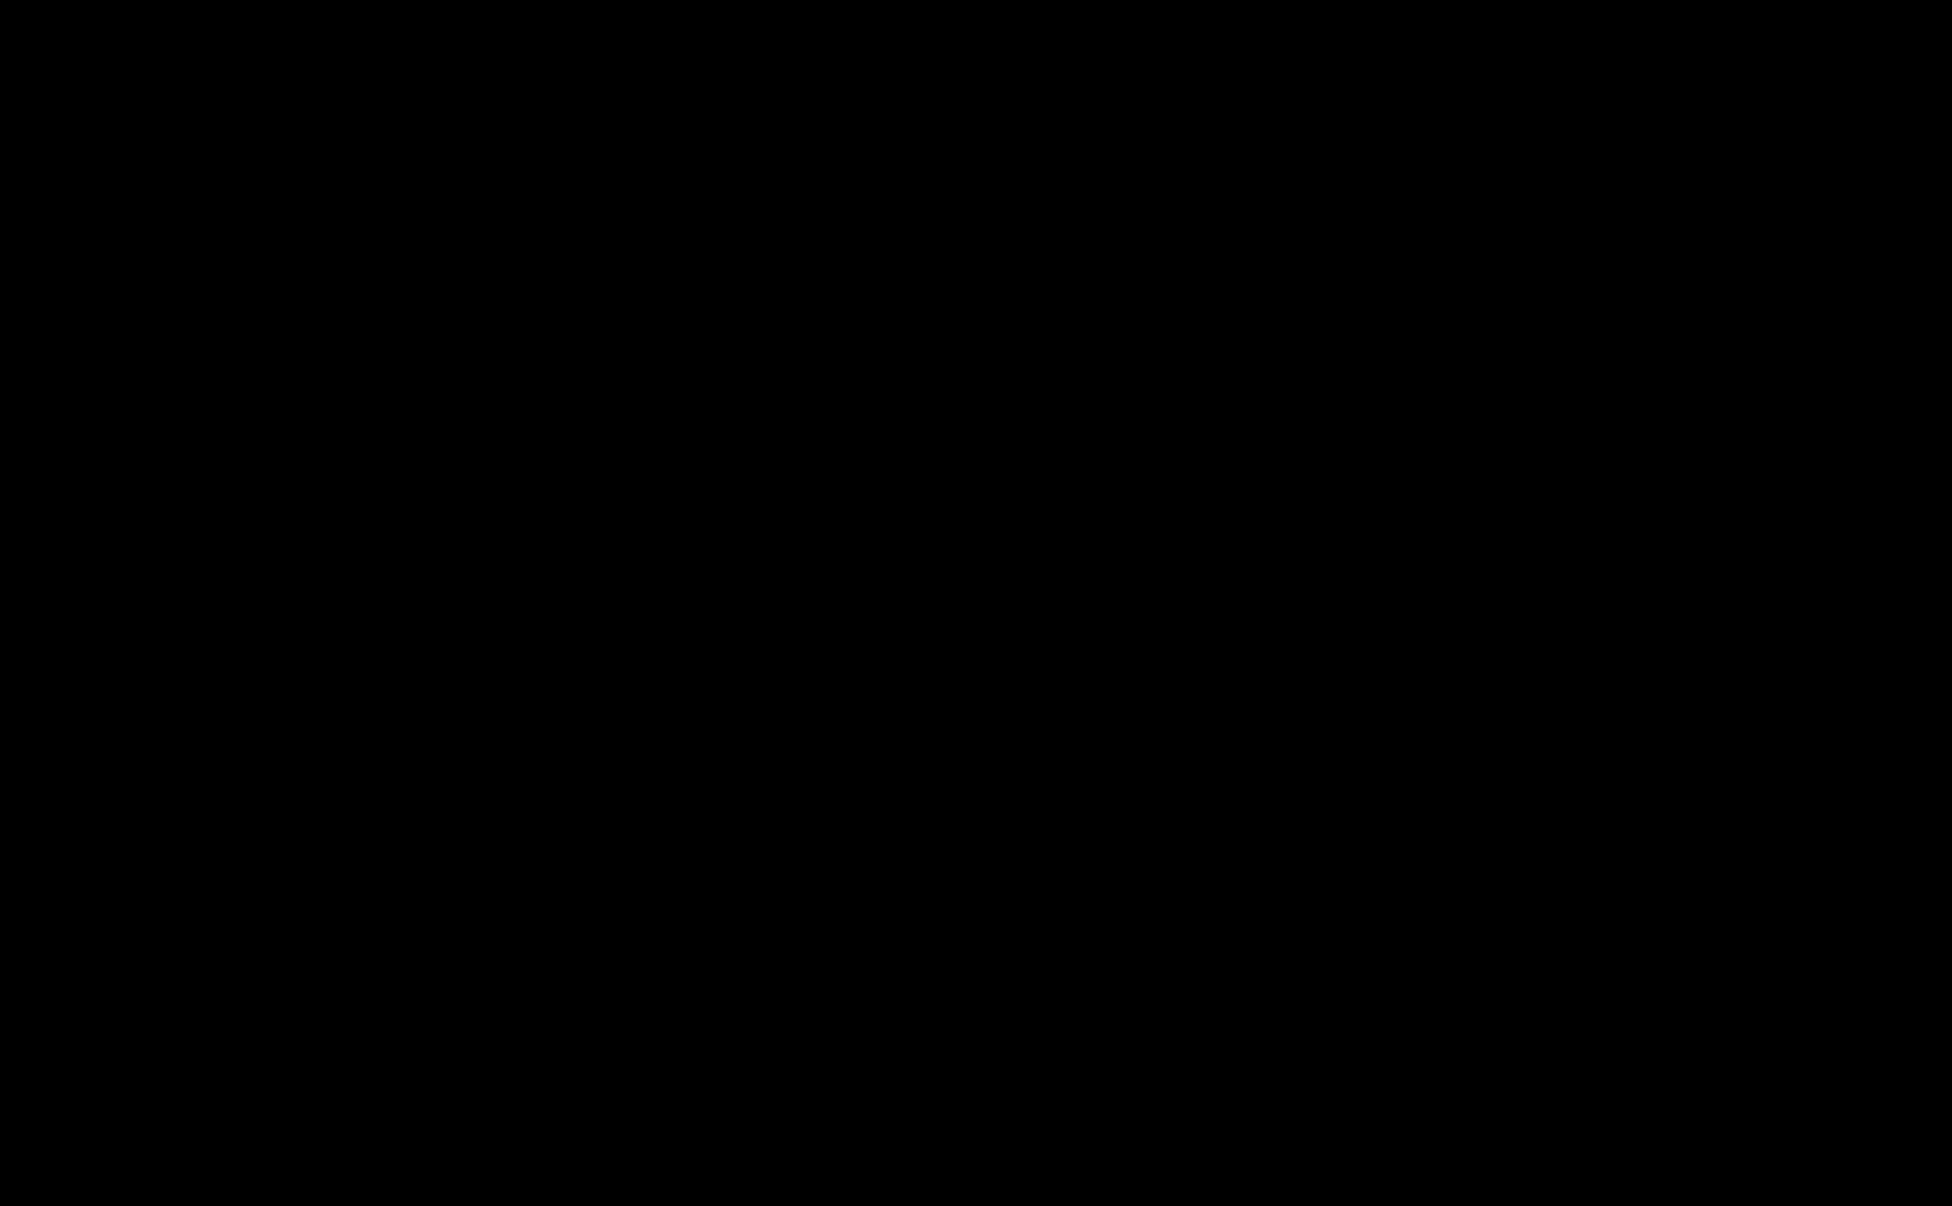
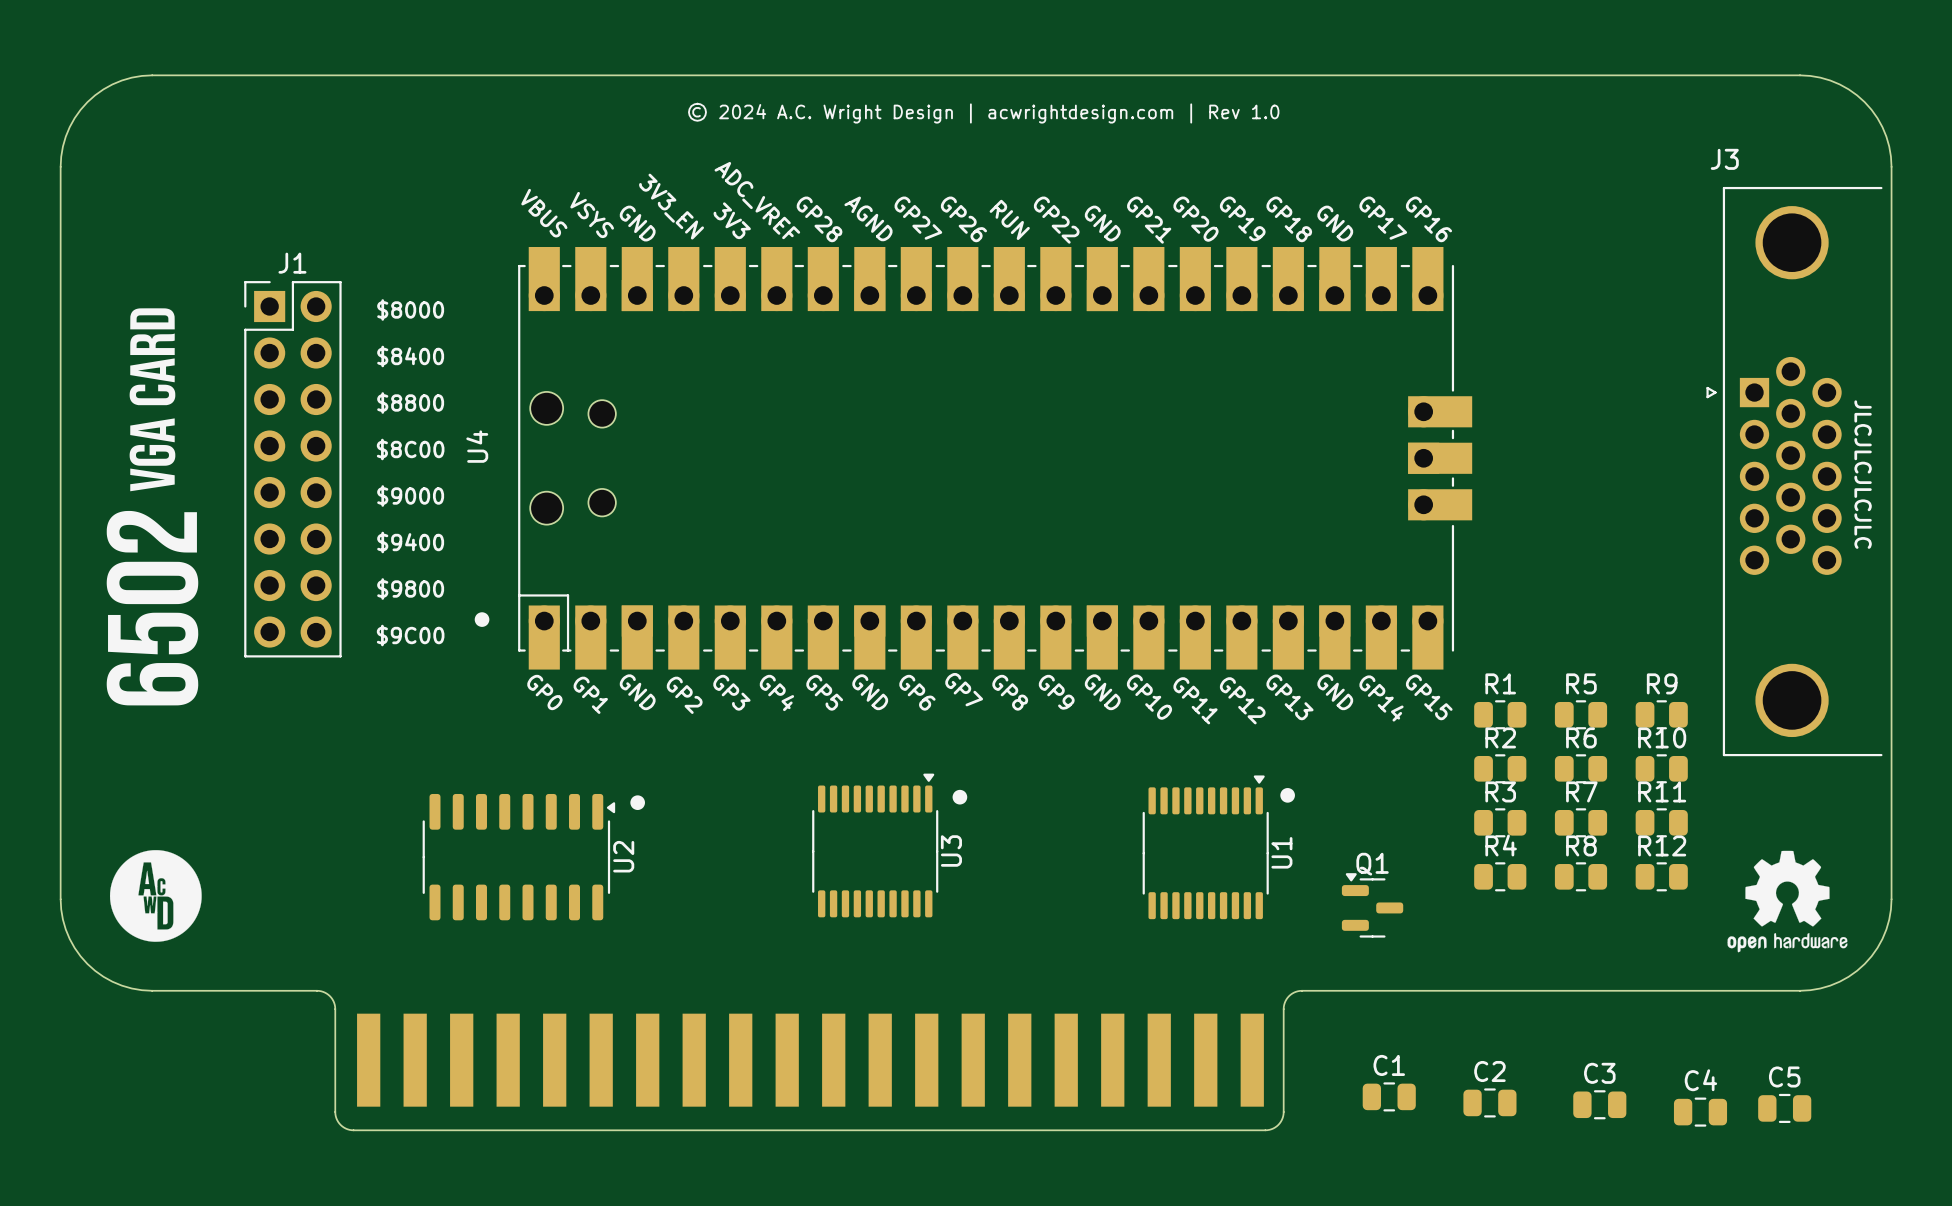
board edge: none -> (152, 75) (1799, 75) (1820, 77) (1839, 84) (1864, 102) (1877, 118) (1886, 136) (1891, 166) (1891, 899) (1889, 919) (1882, 938) (1864, 963) (1848, 976) (1830, 985) (1810, 990) (1295, 991) (1287, 997) (1283, 1007) (1283, 1116) (1278, 1124) (1267, 1130) (353, 1130) (345, 1128) (338, 1121) (335, 1114) (335, 1007) (328, 994) (316, 990) (152, 990) (131, 988) (103, 976) (87, 963) (74, 947) (62, 919) (60, 899) (61, 156) (69, 127) (87, 102) (112, 84) (131, 77) (152, 75)
text: none -> © 2024 A.C. Wright Design | acwrightdesign.com | Rev 1.0 (983, 113)
drawing: none -> [106, 308, 199, 706]
text: none -> $8000 (410, 309)
text: none -> $8400 (410, 356)
text: none -> $8800 (410, 402)
text: none -> $8C00 (410, 449)
U4: none -> (995, 458)
J1: none -> (292, 469)
J3: none -> (1794, 471)
text: none -> JLCJLCJLCJLC (1863, 474)
text: none -> $9000 (410, 496)
text: none -> $9400 (410, 542)
text: none -> $9800 (410, 589)
drawing: none -> [474, 612, 490, 627]
text: none -> $9C00 (410, 635)
R1: none -> (1500, 714)
R5: none -> (1580, 714)
R9: none -> (1661, 714)
R2: none -> (1500, 768)
R6: none -> (1580, 768)
R10: none -> (1661, 768)
drawing: none -> [1280, 788, 1295, 803]
drawing: none -> [952, 789, 968, 805]
drawing: none -> [630, 795, 645, 811]
R3: none -> (1500, 822)
R7: none -> (1580, 822)
R11: none -> (1661, 822)
U3: none -> (875, 845)
U1: none -> (1205, 847)
drawing: none -> [110, 850, 202, 942]
drawing: none -> [1727, 850, 1848, 953]
U2: none -> (518, 857)
R4: none -> (1500, 876)
R8: none -> (1580, 876)
R12: none -> (1661, 876)
Q1: none -> (1372, 905)
part: none -> (810, 1060)
C1: none -> (1389, 1096)
C2: none -> (1489, 1102)
C3: none -> (1599, 1104)
C5: none -> (1784, 1108)
C4: none -> (1700, 1112)

